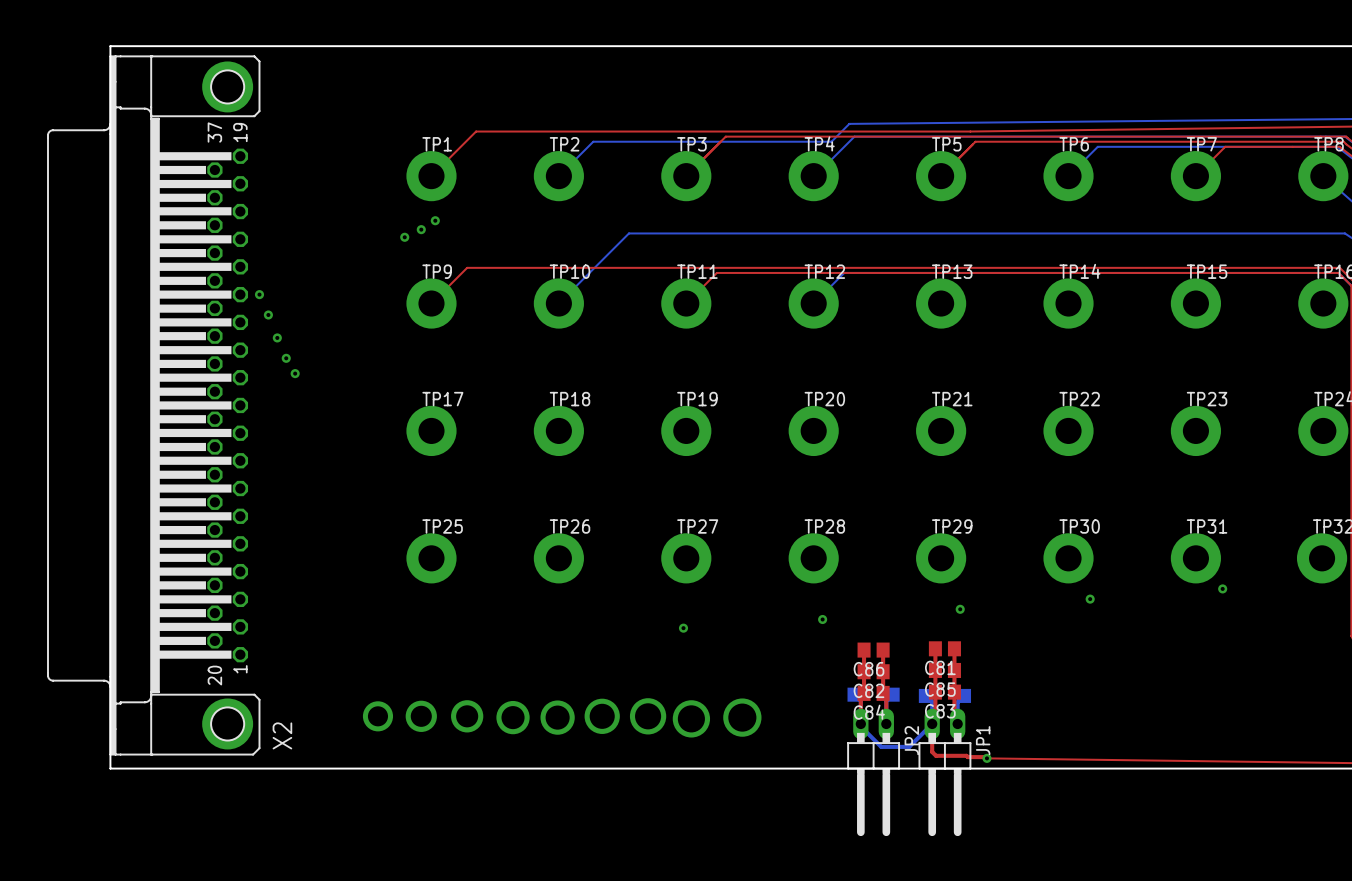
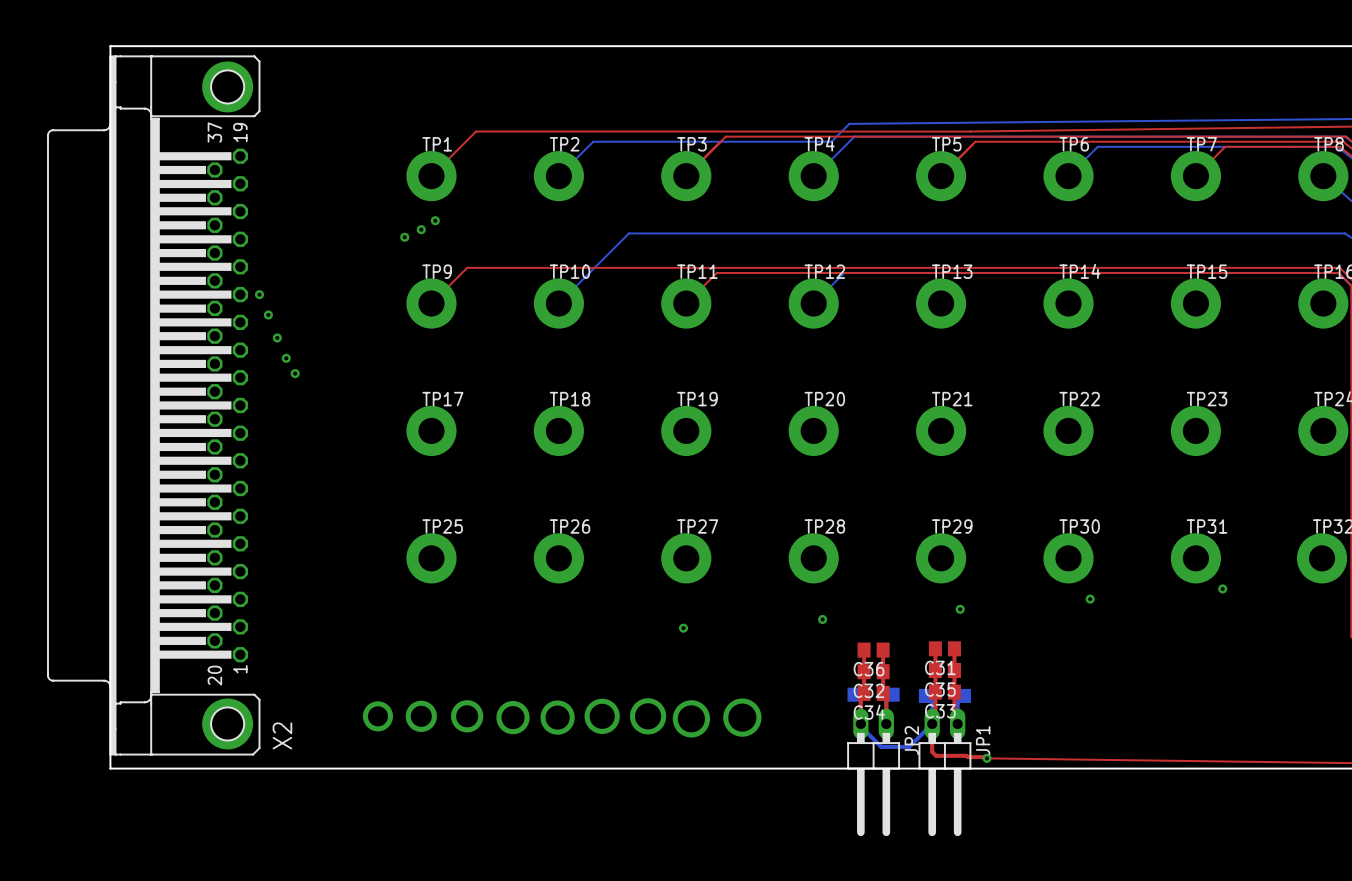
C81 name: C81 (940, 667) -> C31 (940, 667)
C86 name: C86 (869, 669) -> C36 (869, 669)
C85 name: C85 (940, 689) -> C35 (940, 689)
C82 name: C82 (869, 690) -> C32 (869, 690)
C83 name: C83 (940, 711) -> C33 (940, 711)
C84 name: C84 (869, 712) -> C34 (869, 712)

